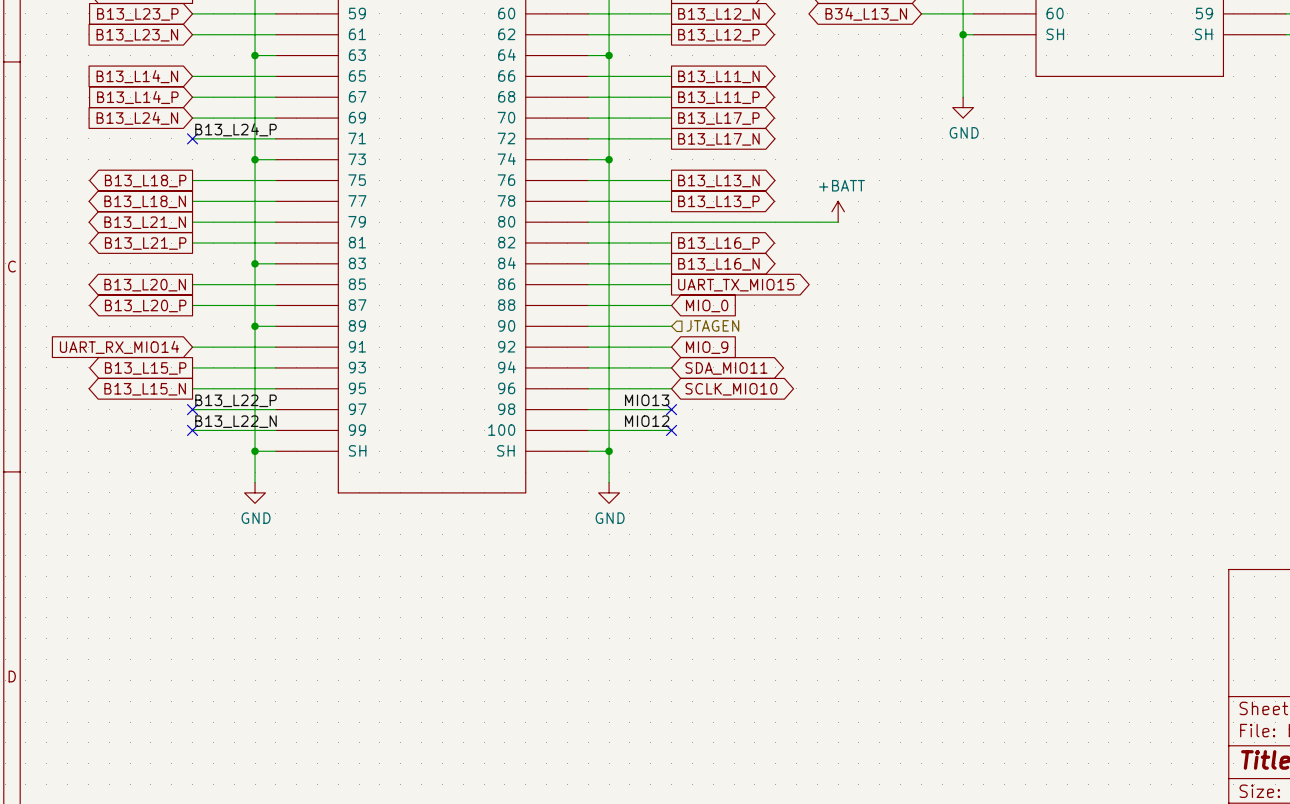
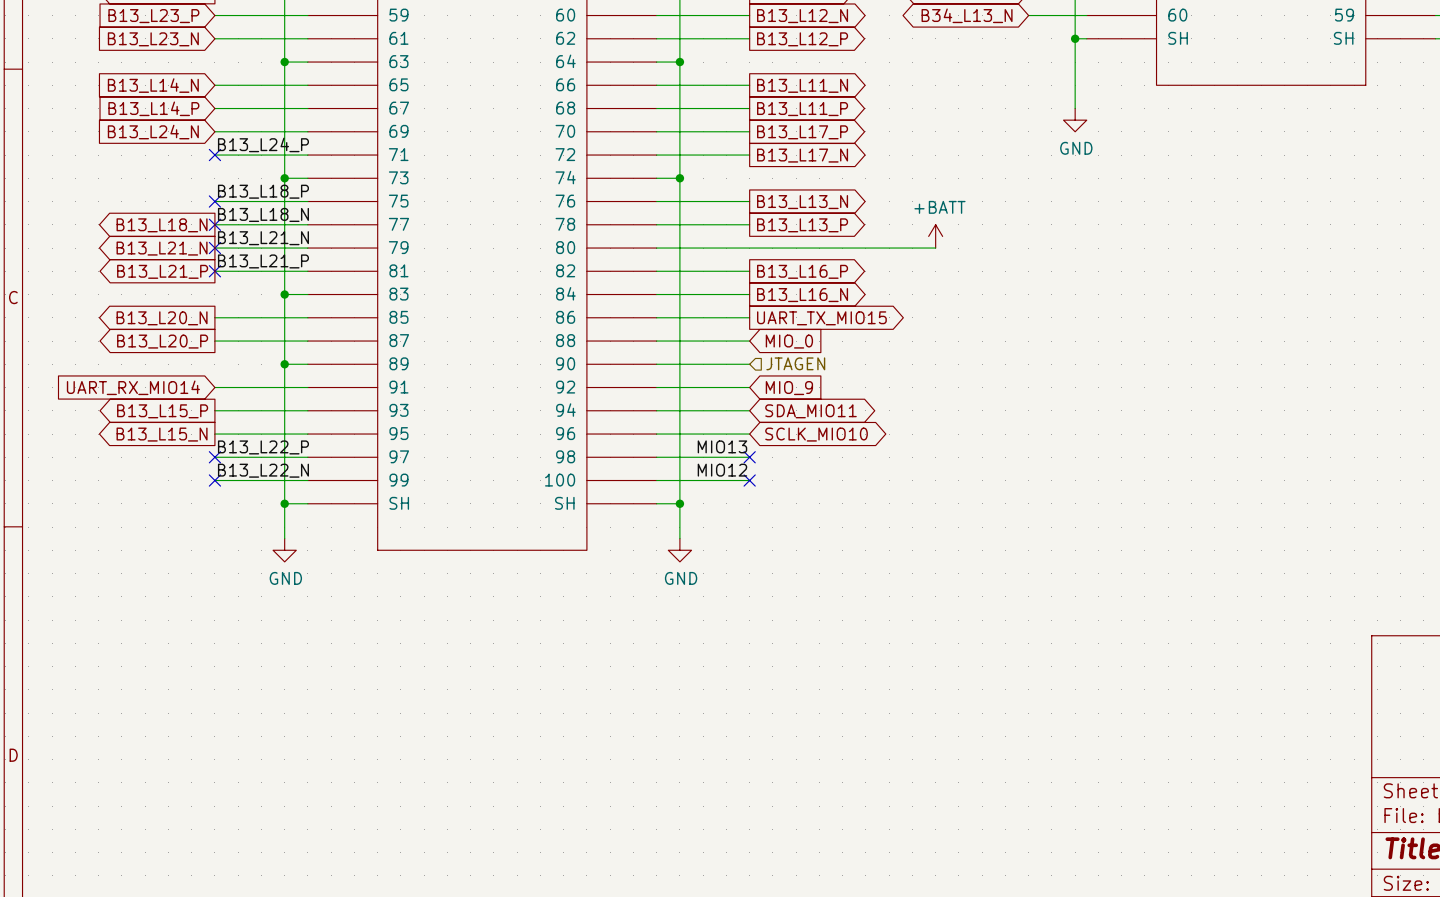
label: none -> B13_L18_P (263, 191)
no-connect mark: none -> (214, 201)
global label: B13_L18_P (145, 181) -> none
label: none -> B13_L18_N (263, 214)
no-connect mark: none -> (214, 224)
label: none -> B13_L21_N (263, 238)
no-connect mark: none -> (214, 248)
label: none -> B13_L21_P (263, 261)
no-connect mark: none -> (214, 271)

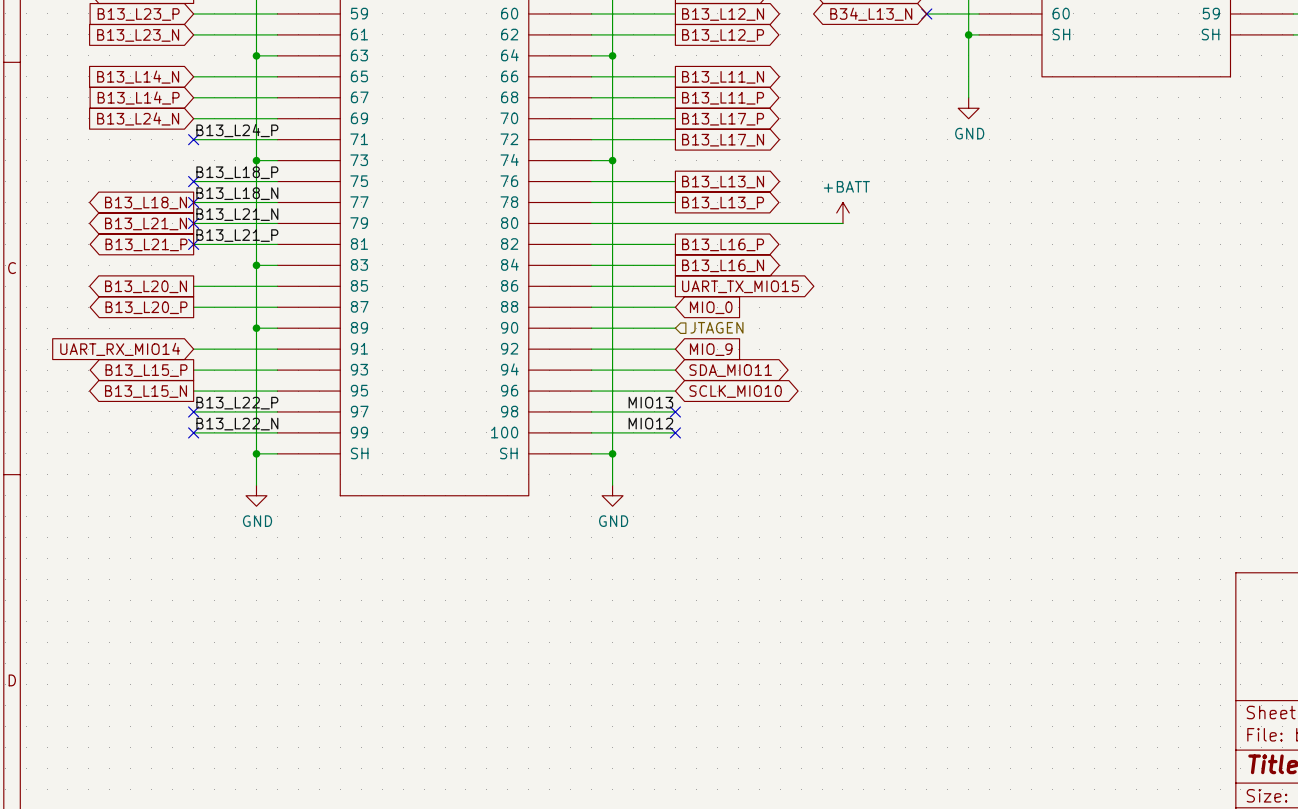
no-connect mark: none -> (926, 13)

